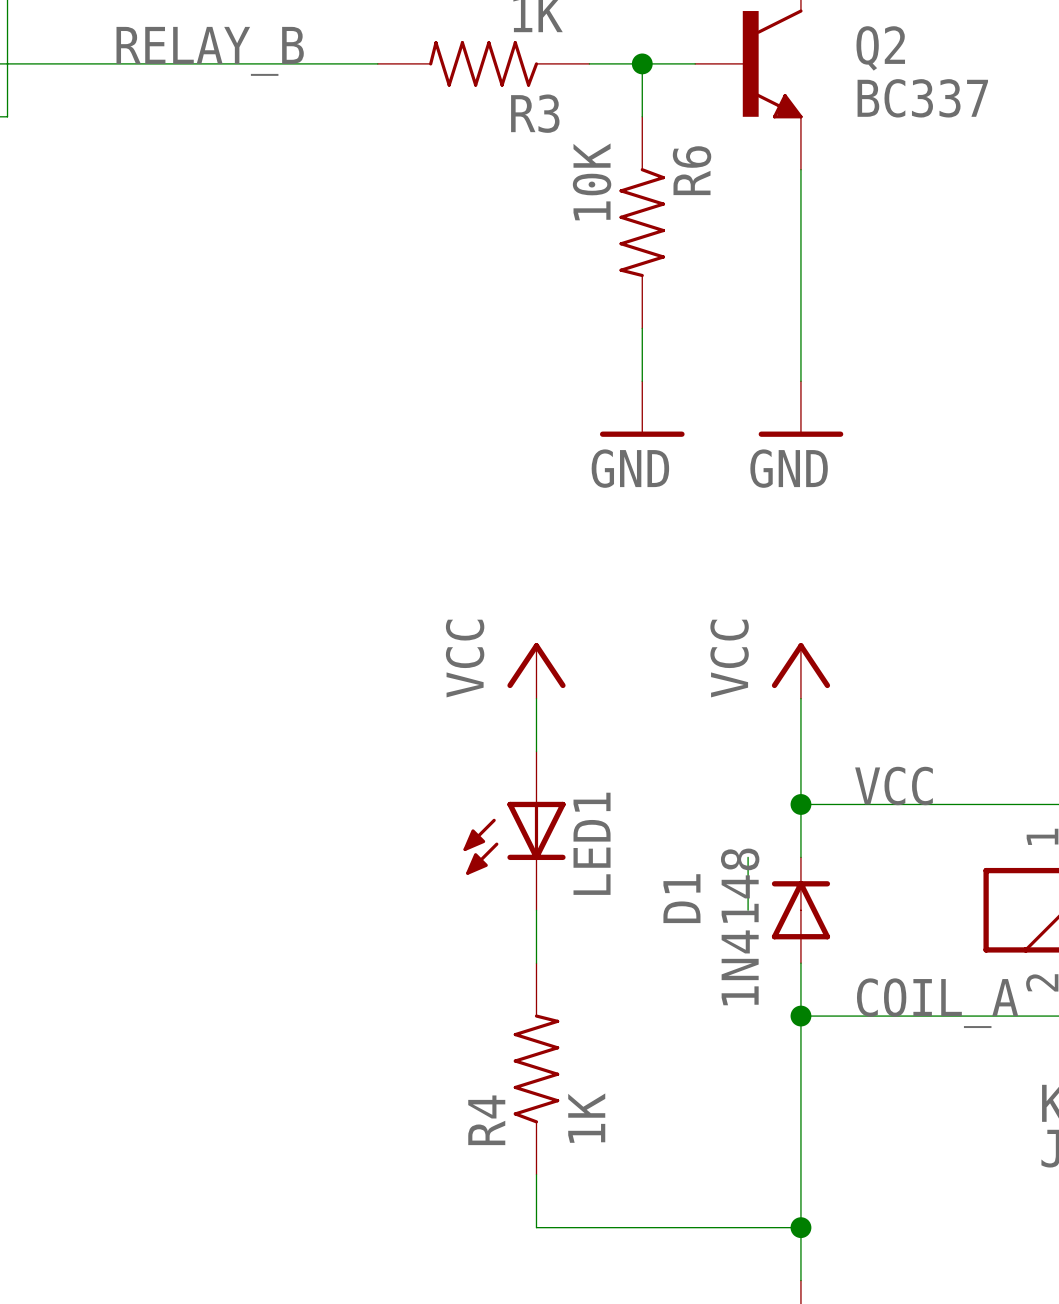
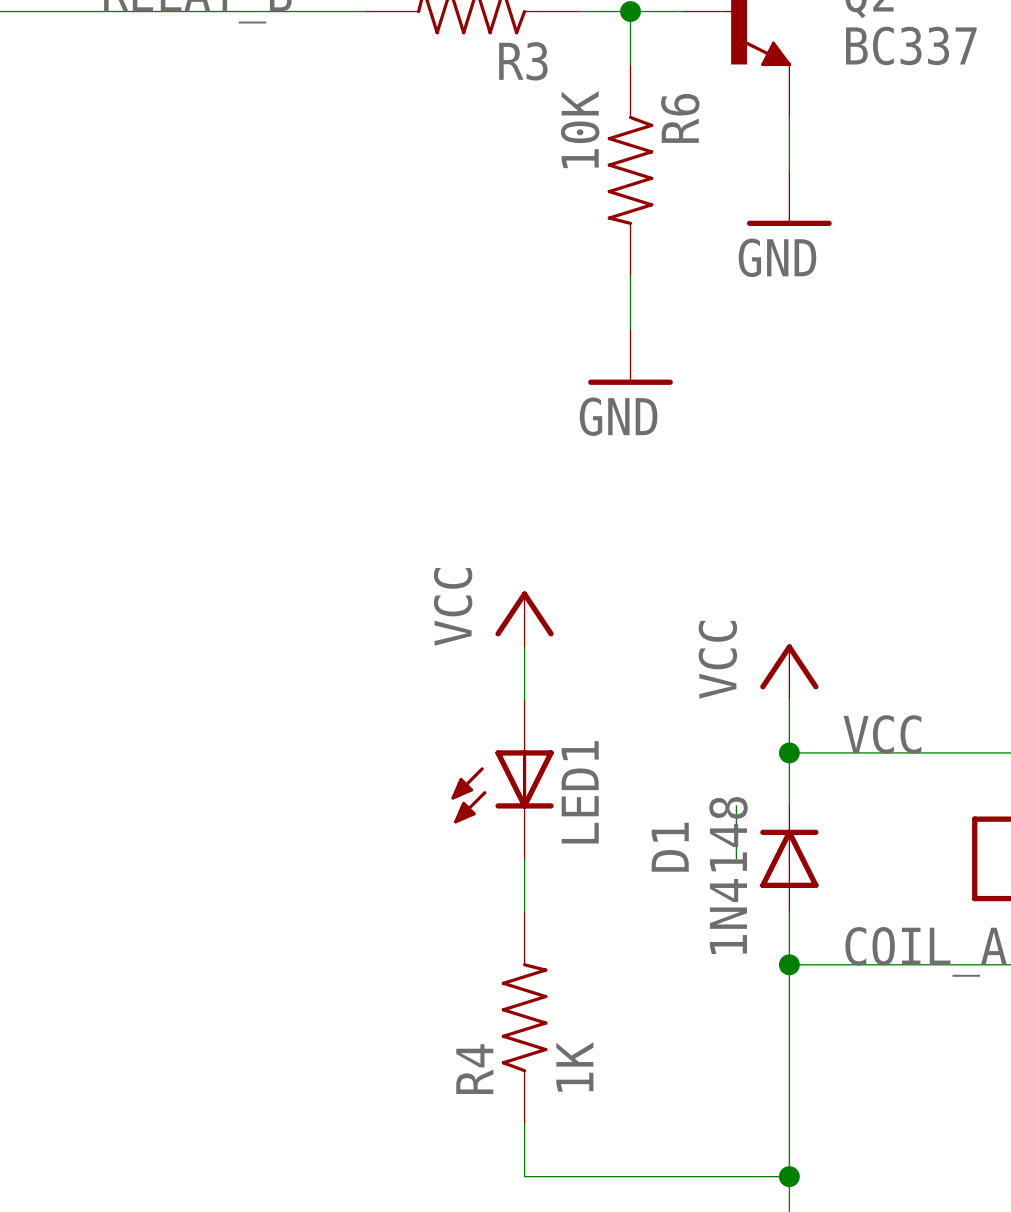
wire: (800, 222) (800, 381) -> none
power symbol position: GND (800, 409) -> GND (789, 198)
power symbol position: VCC (800, 670) -> VCC (789, 672)

